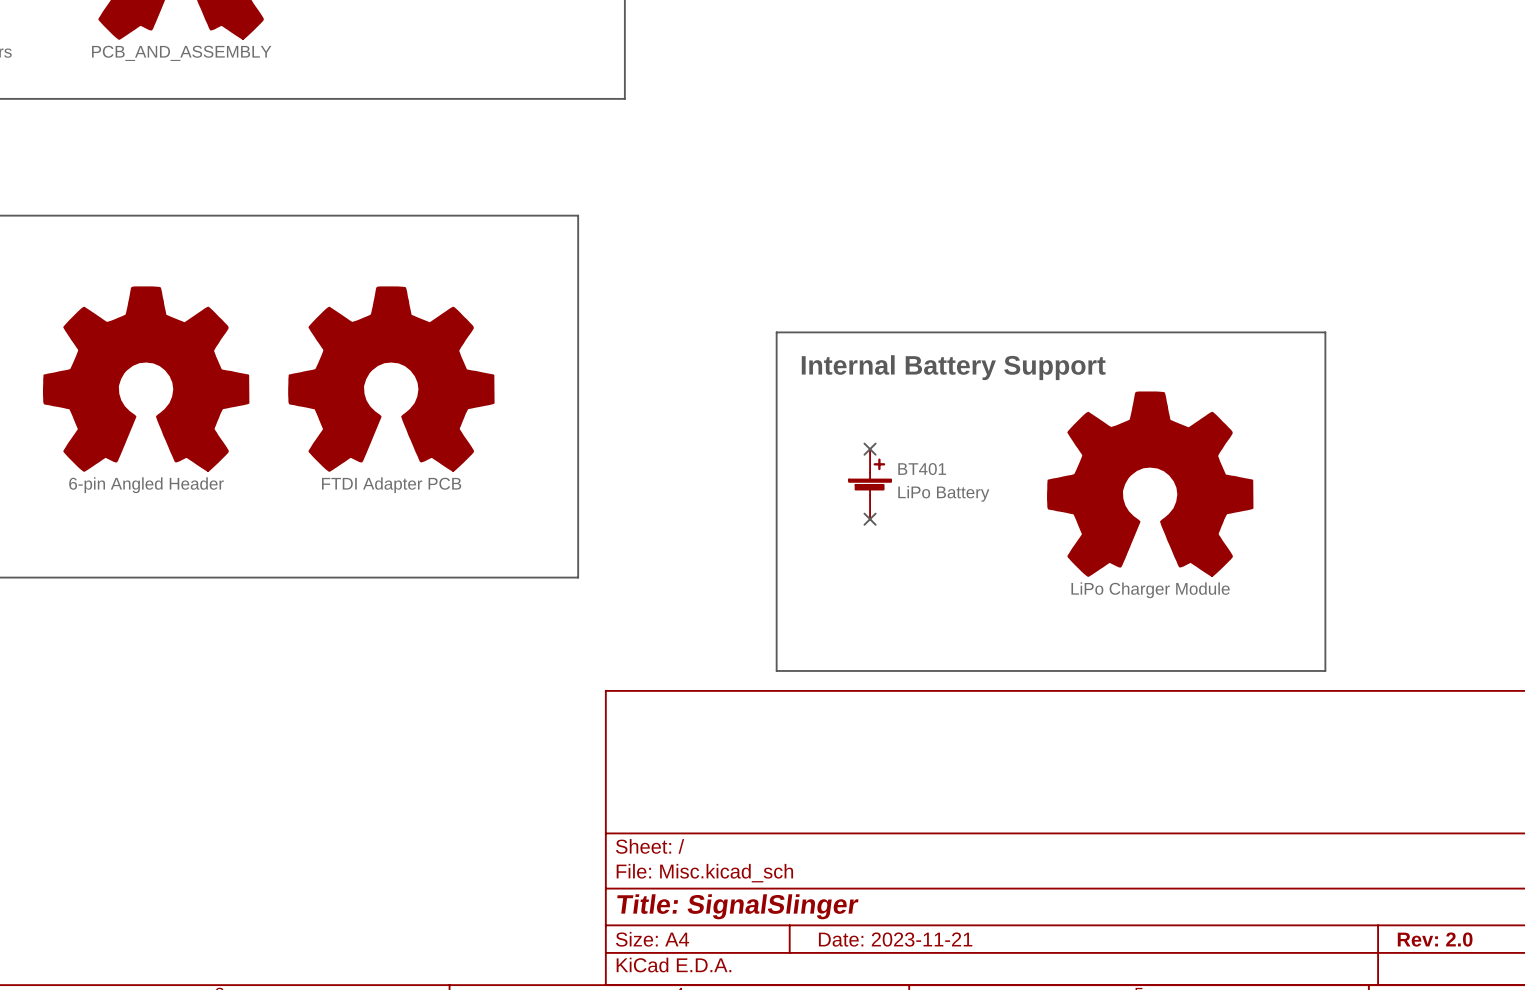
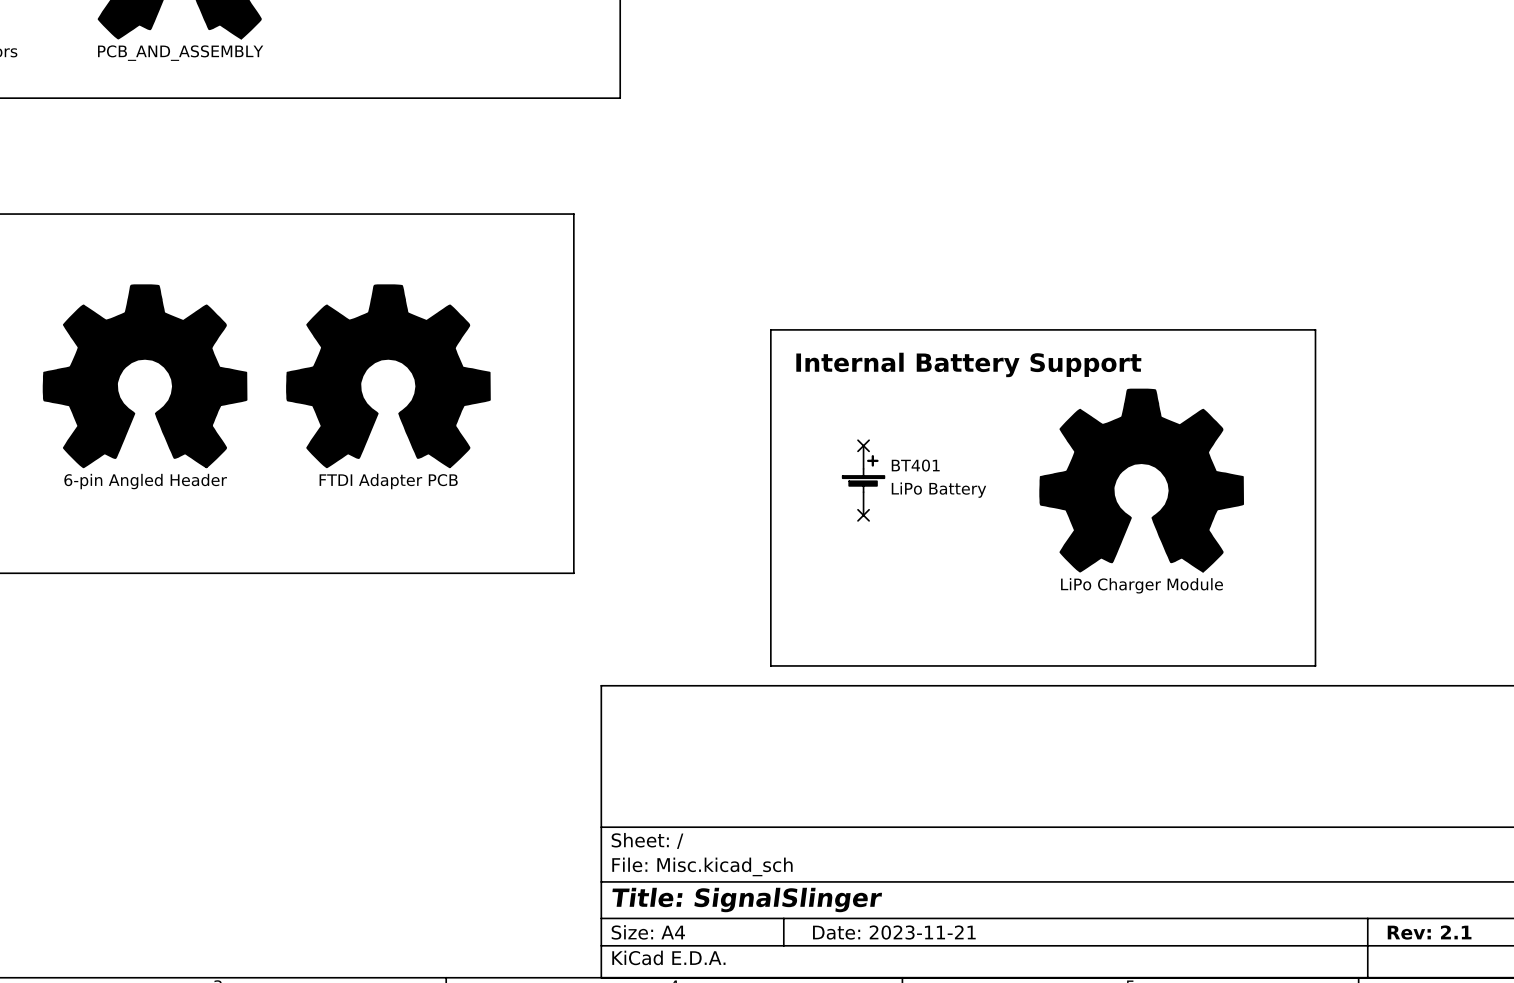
title block: Rev: 2.0 (1435, 939) -> Rev: 2.1 (1429, 932)

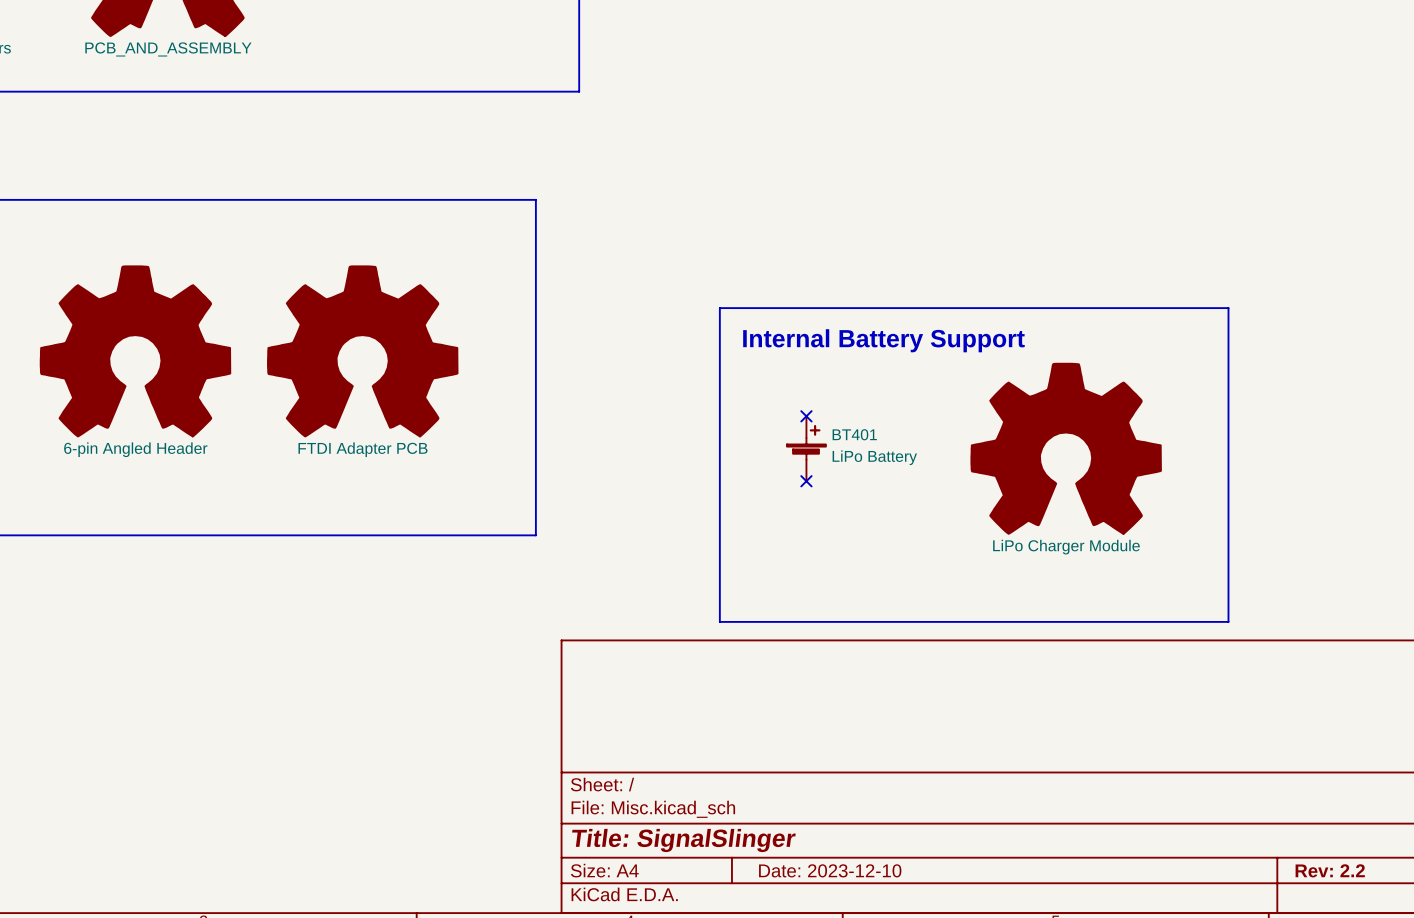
title block: Date: 2023-11-21 (894, 932) -> Date: 2023-12-10 (830, 870)
title block: Rev: 2.1 (1429, 932) -> Rev: 2.2 (1330, 870)

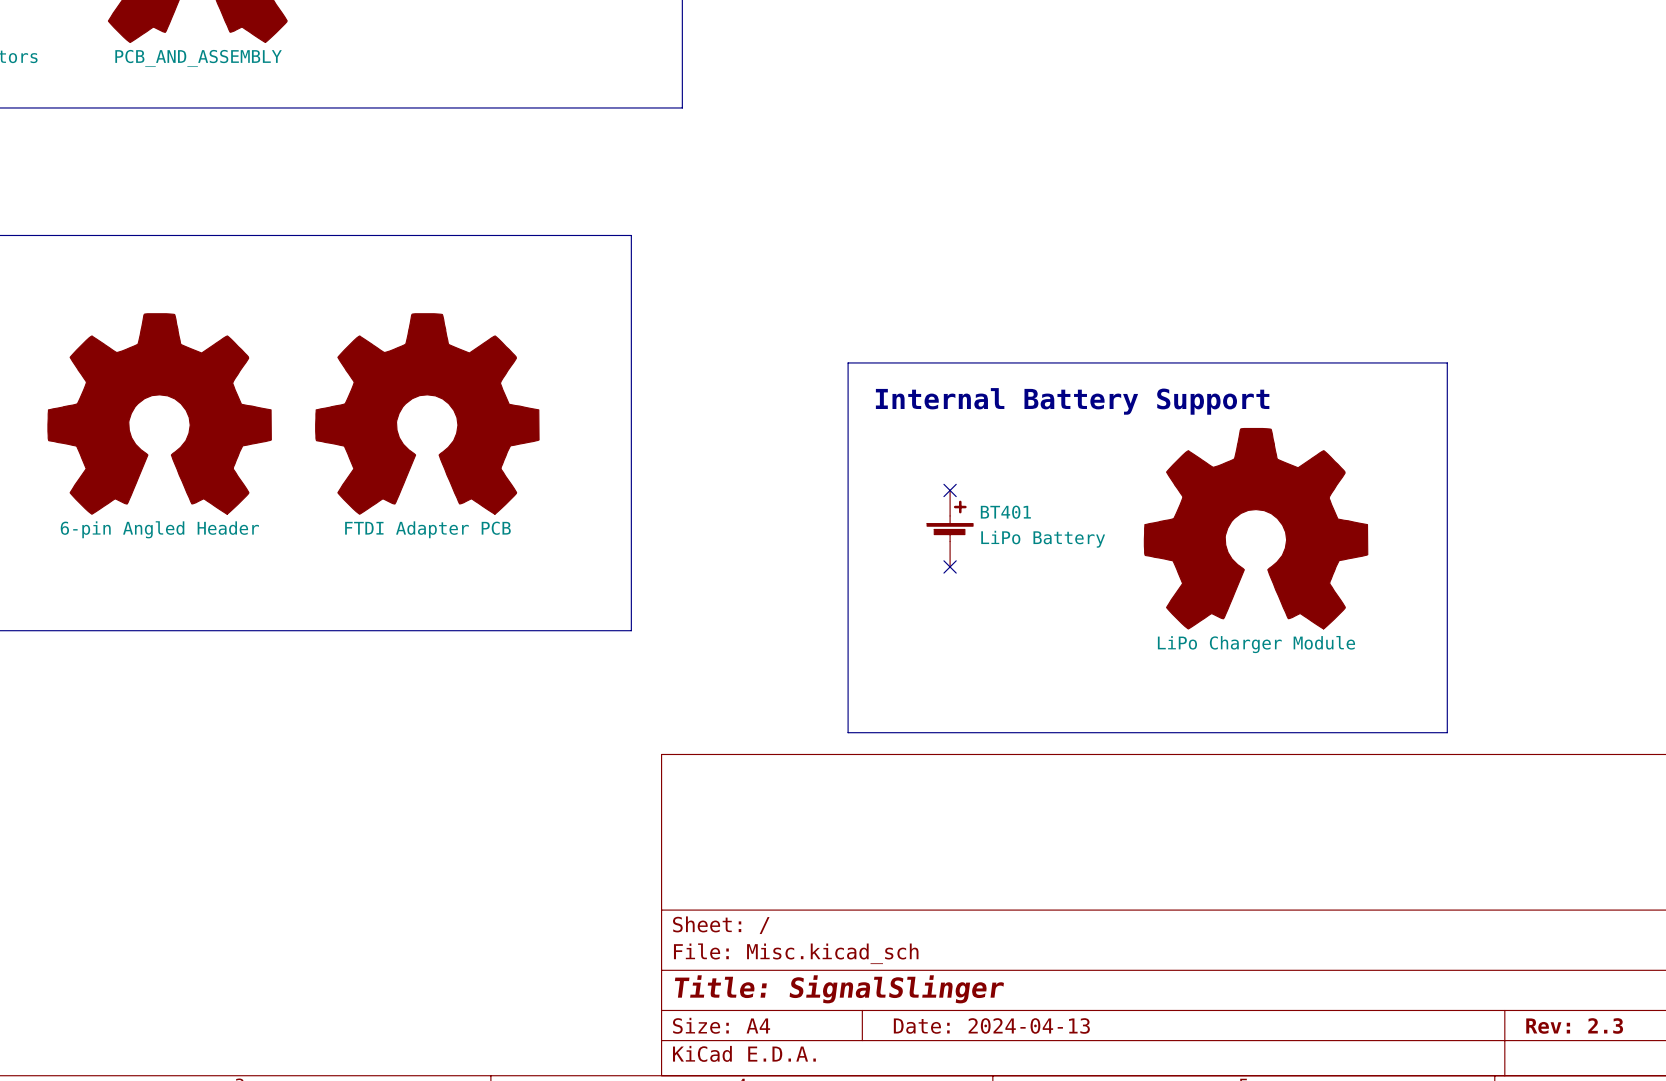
title block: Date: 2023-12-10 (830, 870) -> Date: 2024-04-13 (991, 1025)
title block: Rev: 2.2 (1330, 870) -> Rev: 2.3 (1574, 1025)

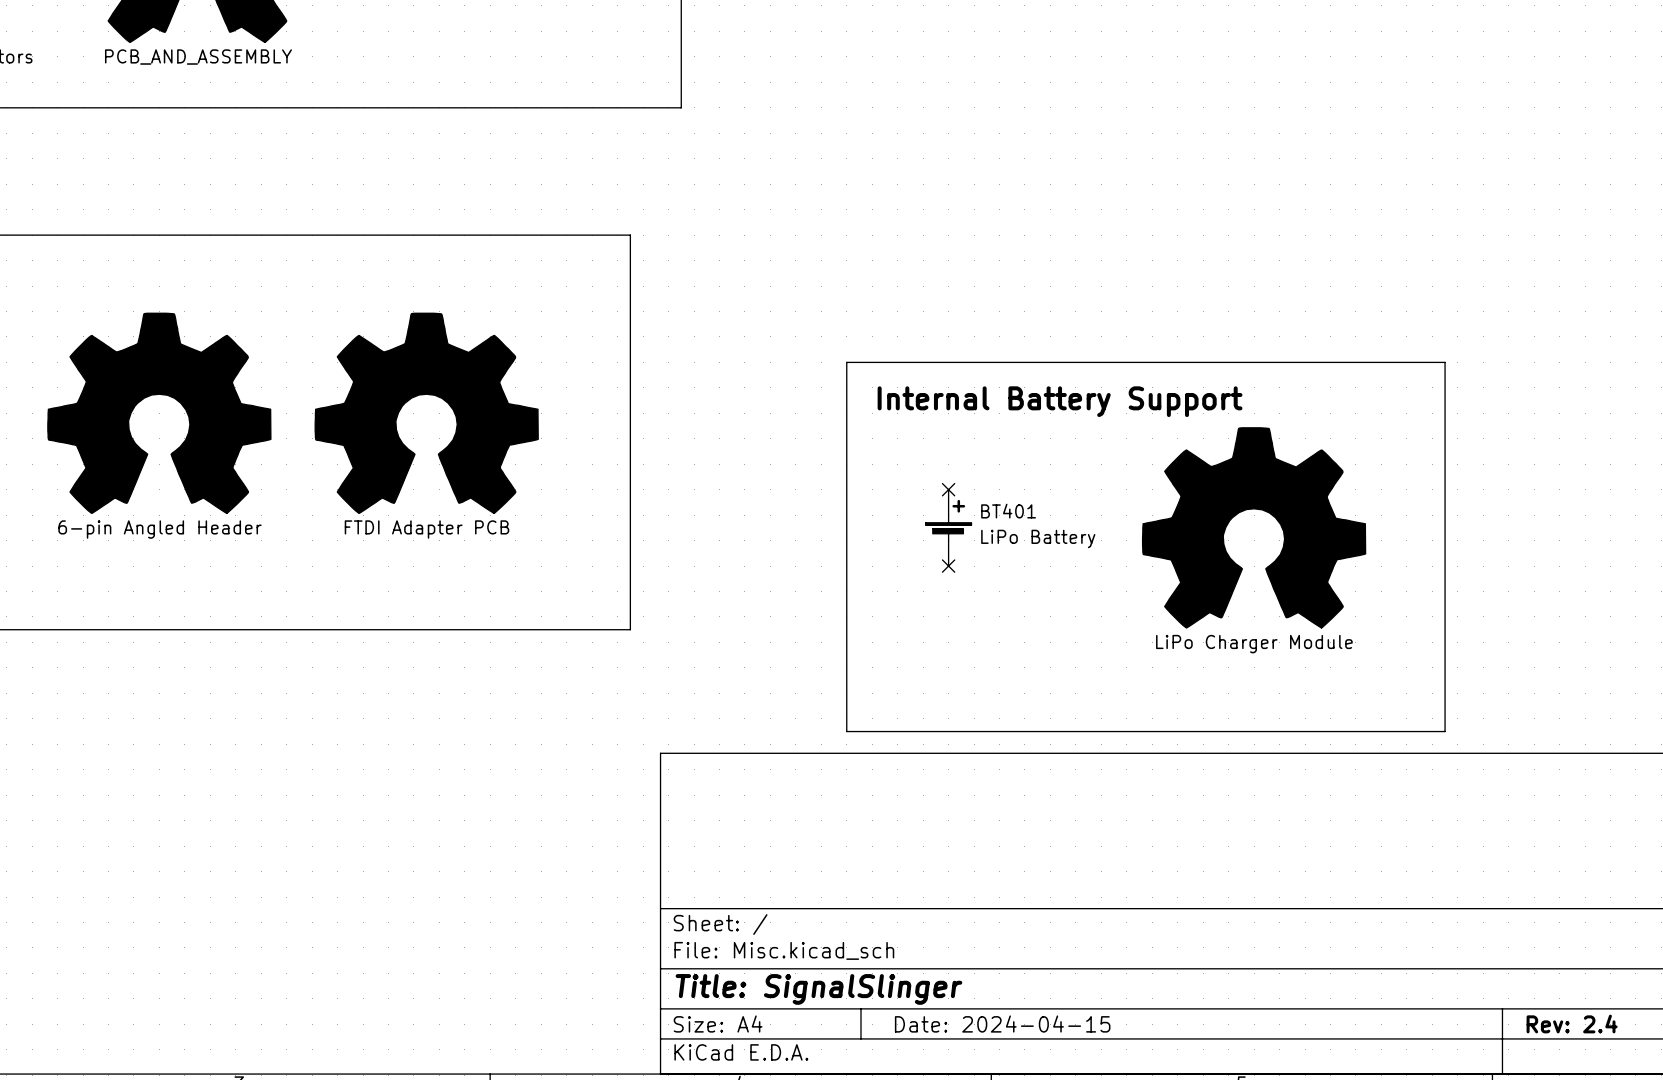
title block: Date: 2024-04-13 (991, 1025) -> Date: 2024-04-15 (1002, 1024)
title block: Rev: 2.3 (1574, 1025) -> Rev: 2.4 (1572, 1024)

